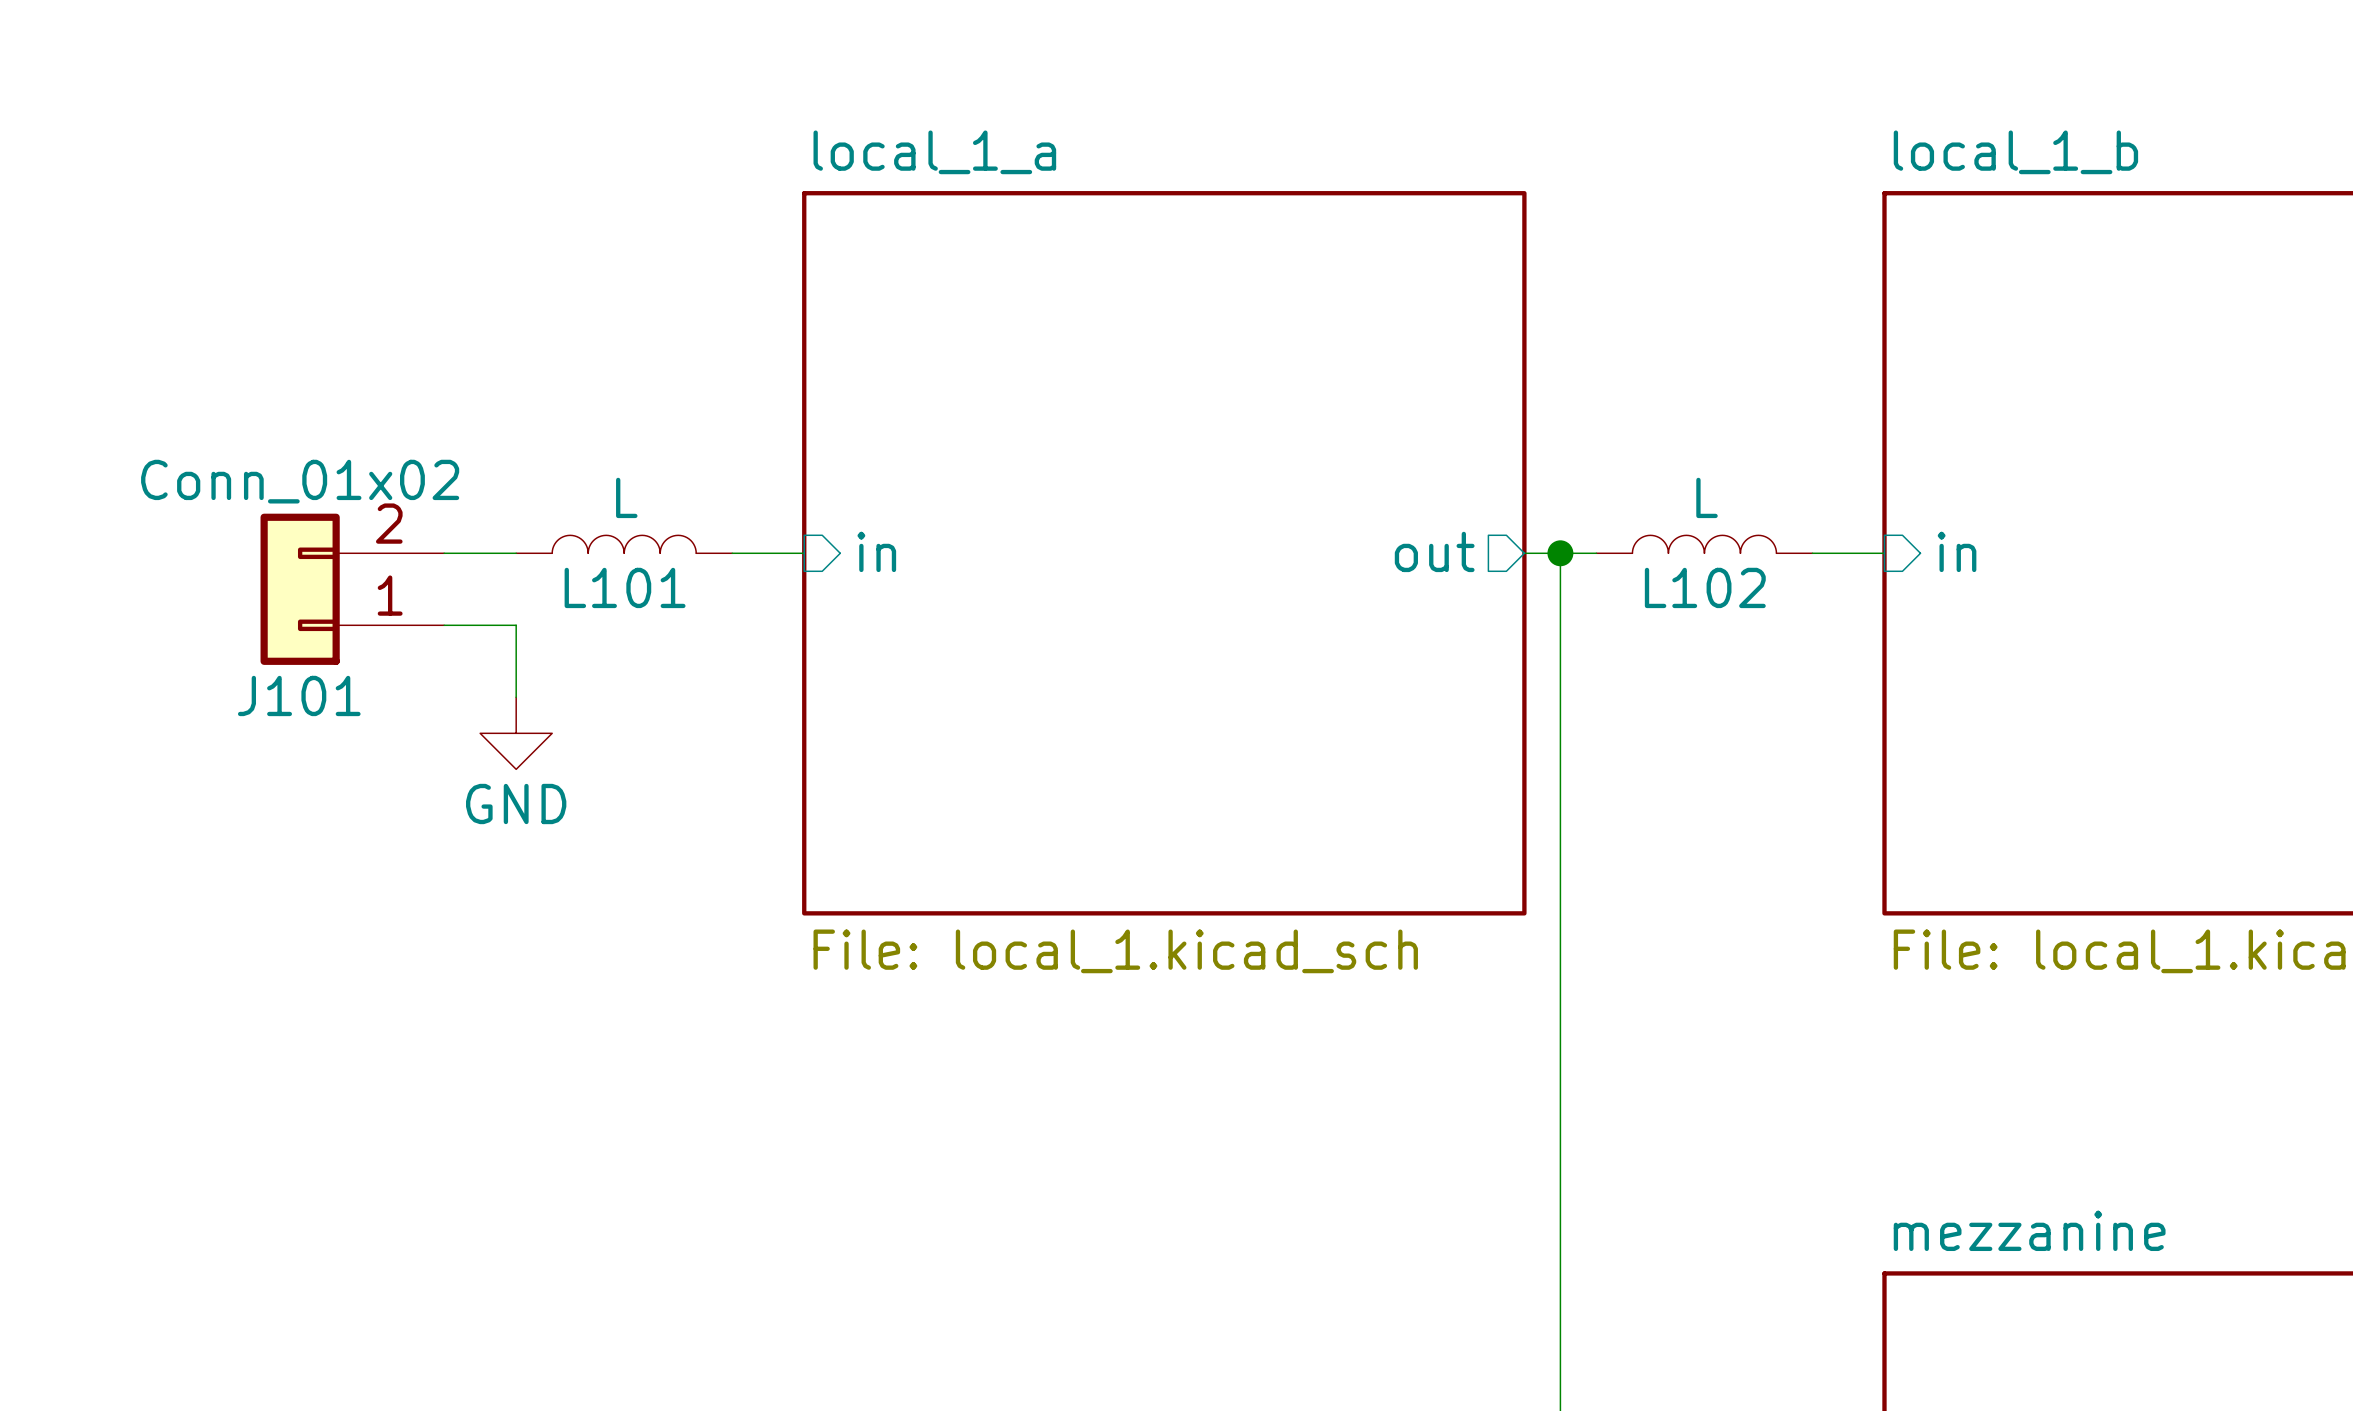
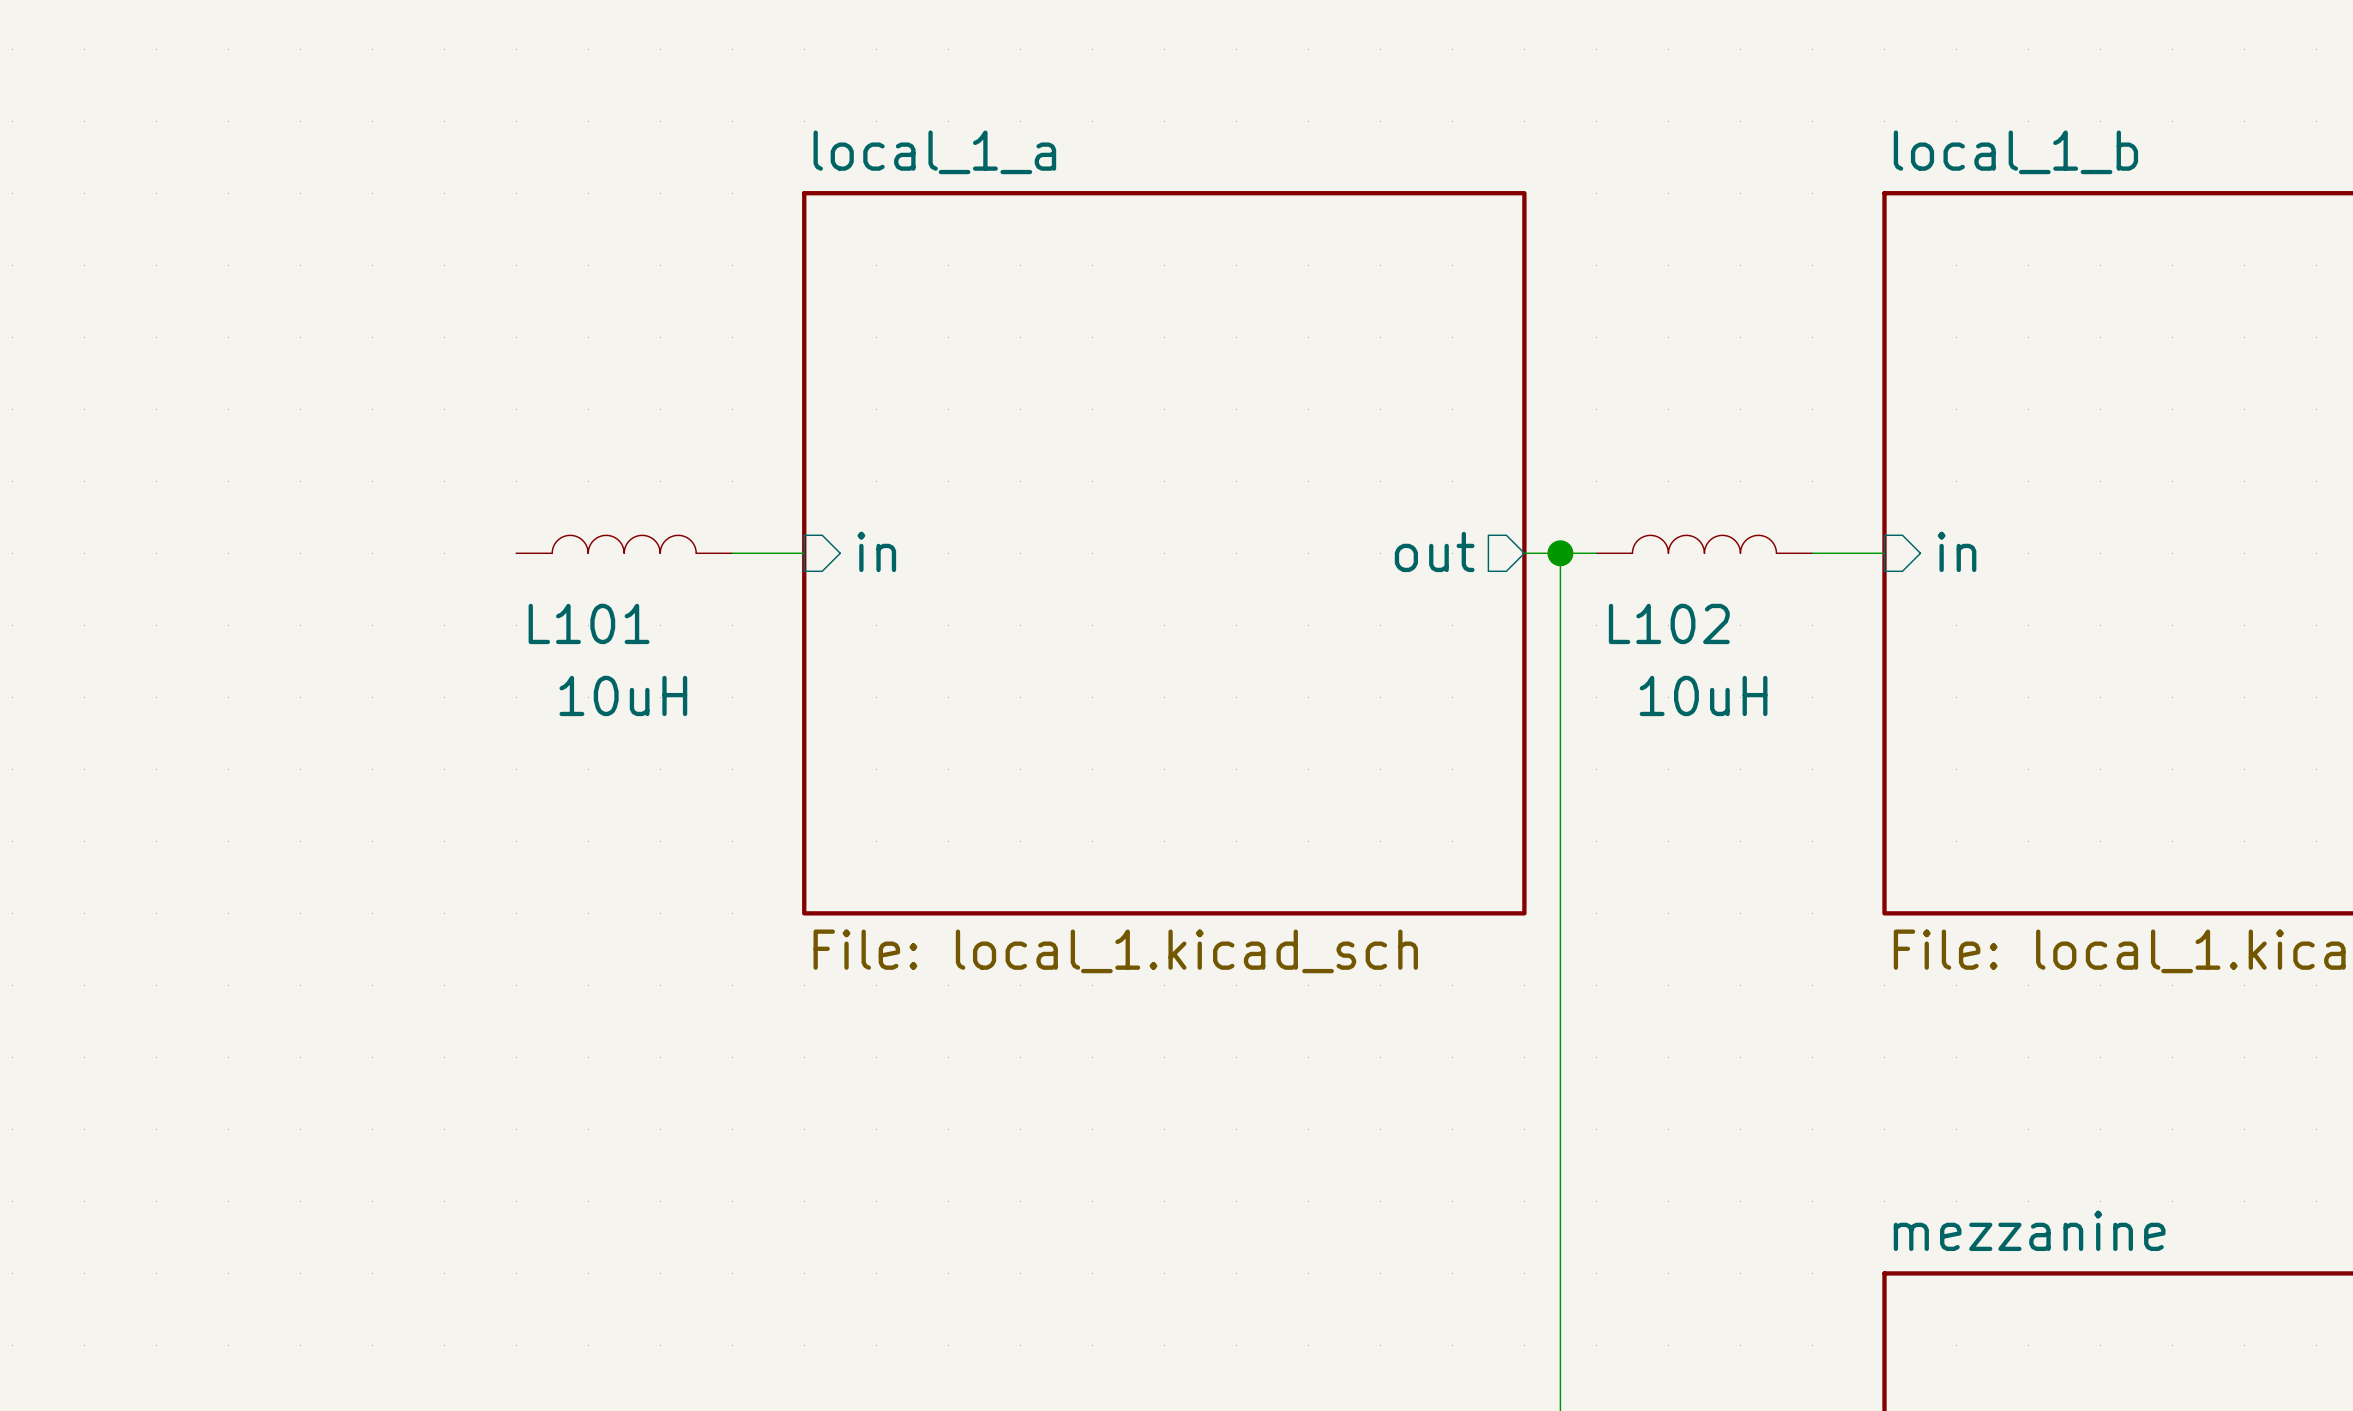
L101 value: L (626, 497) -> 10uH (623, 695)
L102 value: L (1707, 497) -> 10uH (1703, 695)
wire: (444, 553) (516, 553) -> none
L101 name position: L101 (625, 587) -> L101 (589, 623)
L102 name position: L102 (1705, 587) -> L102 (1669, 623)
J101: Conn_01x02 (352, 589) -> none
wire: (444, 625) (516, 625) (516, 697) -> none
power symbol: GND (516, 733) -> none

